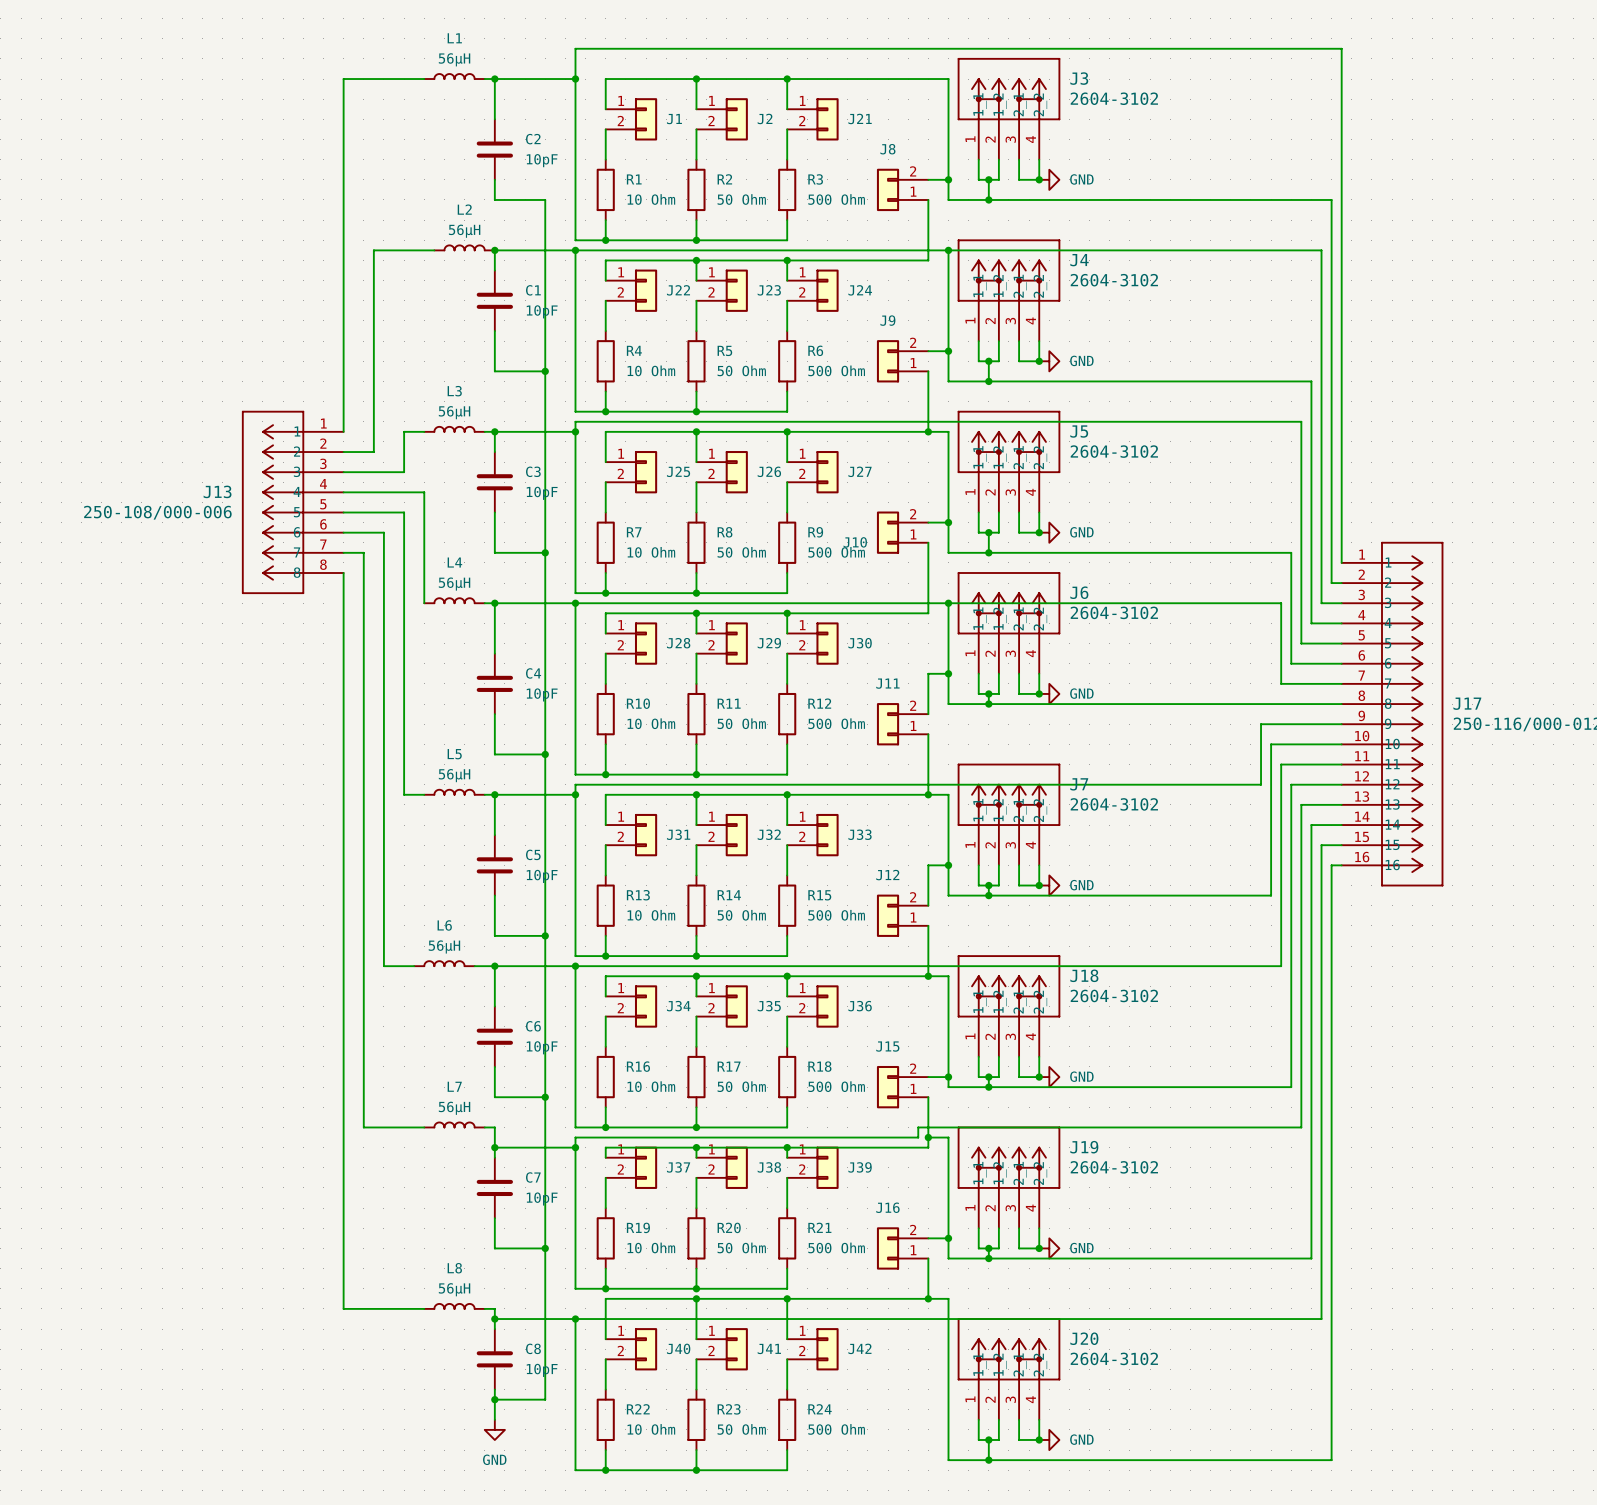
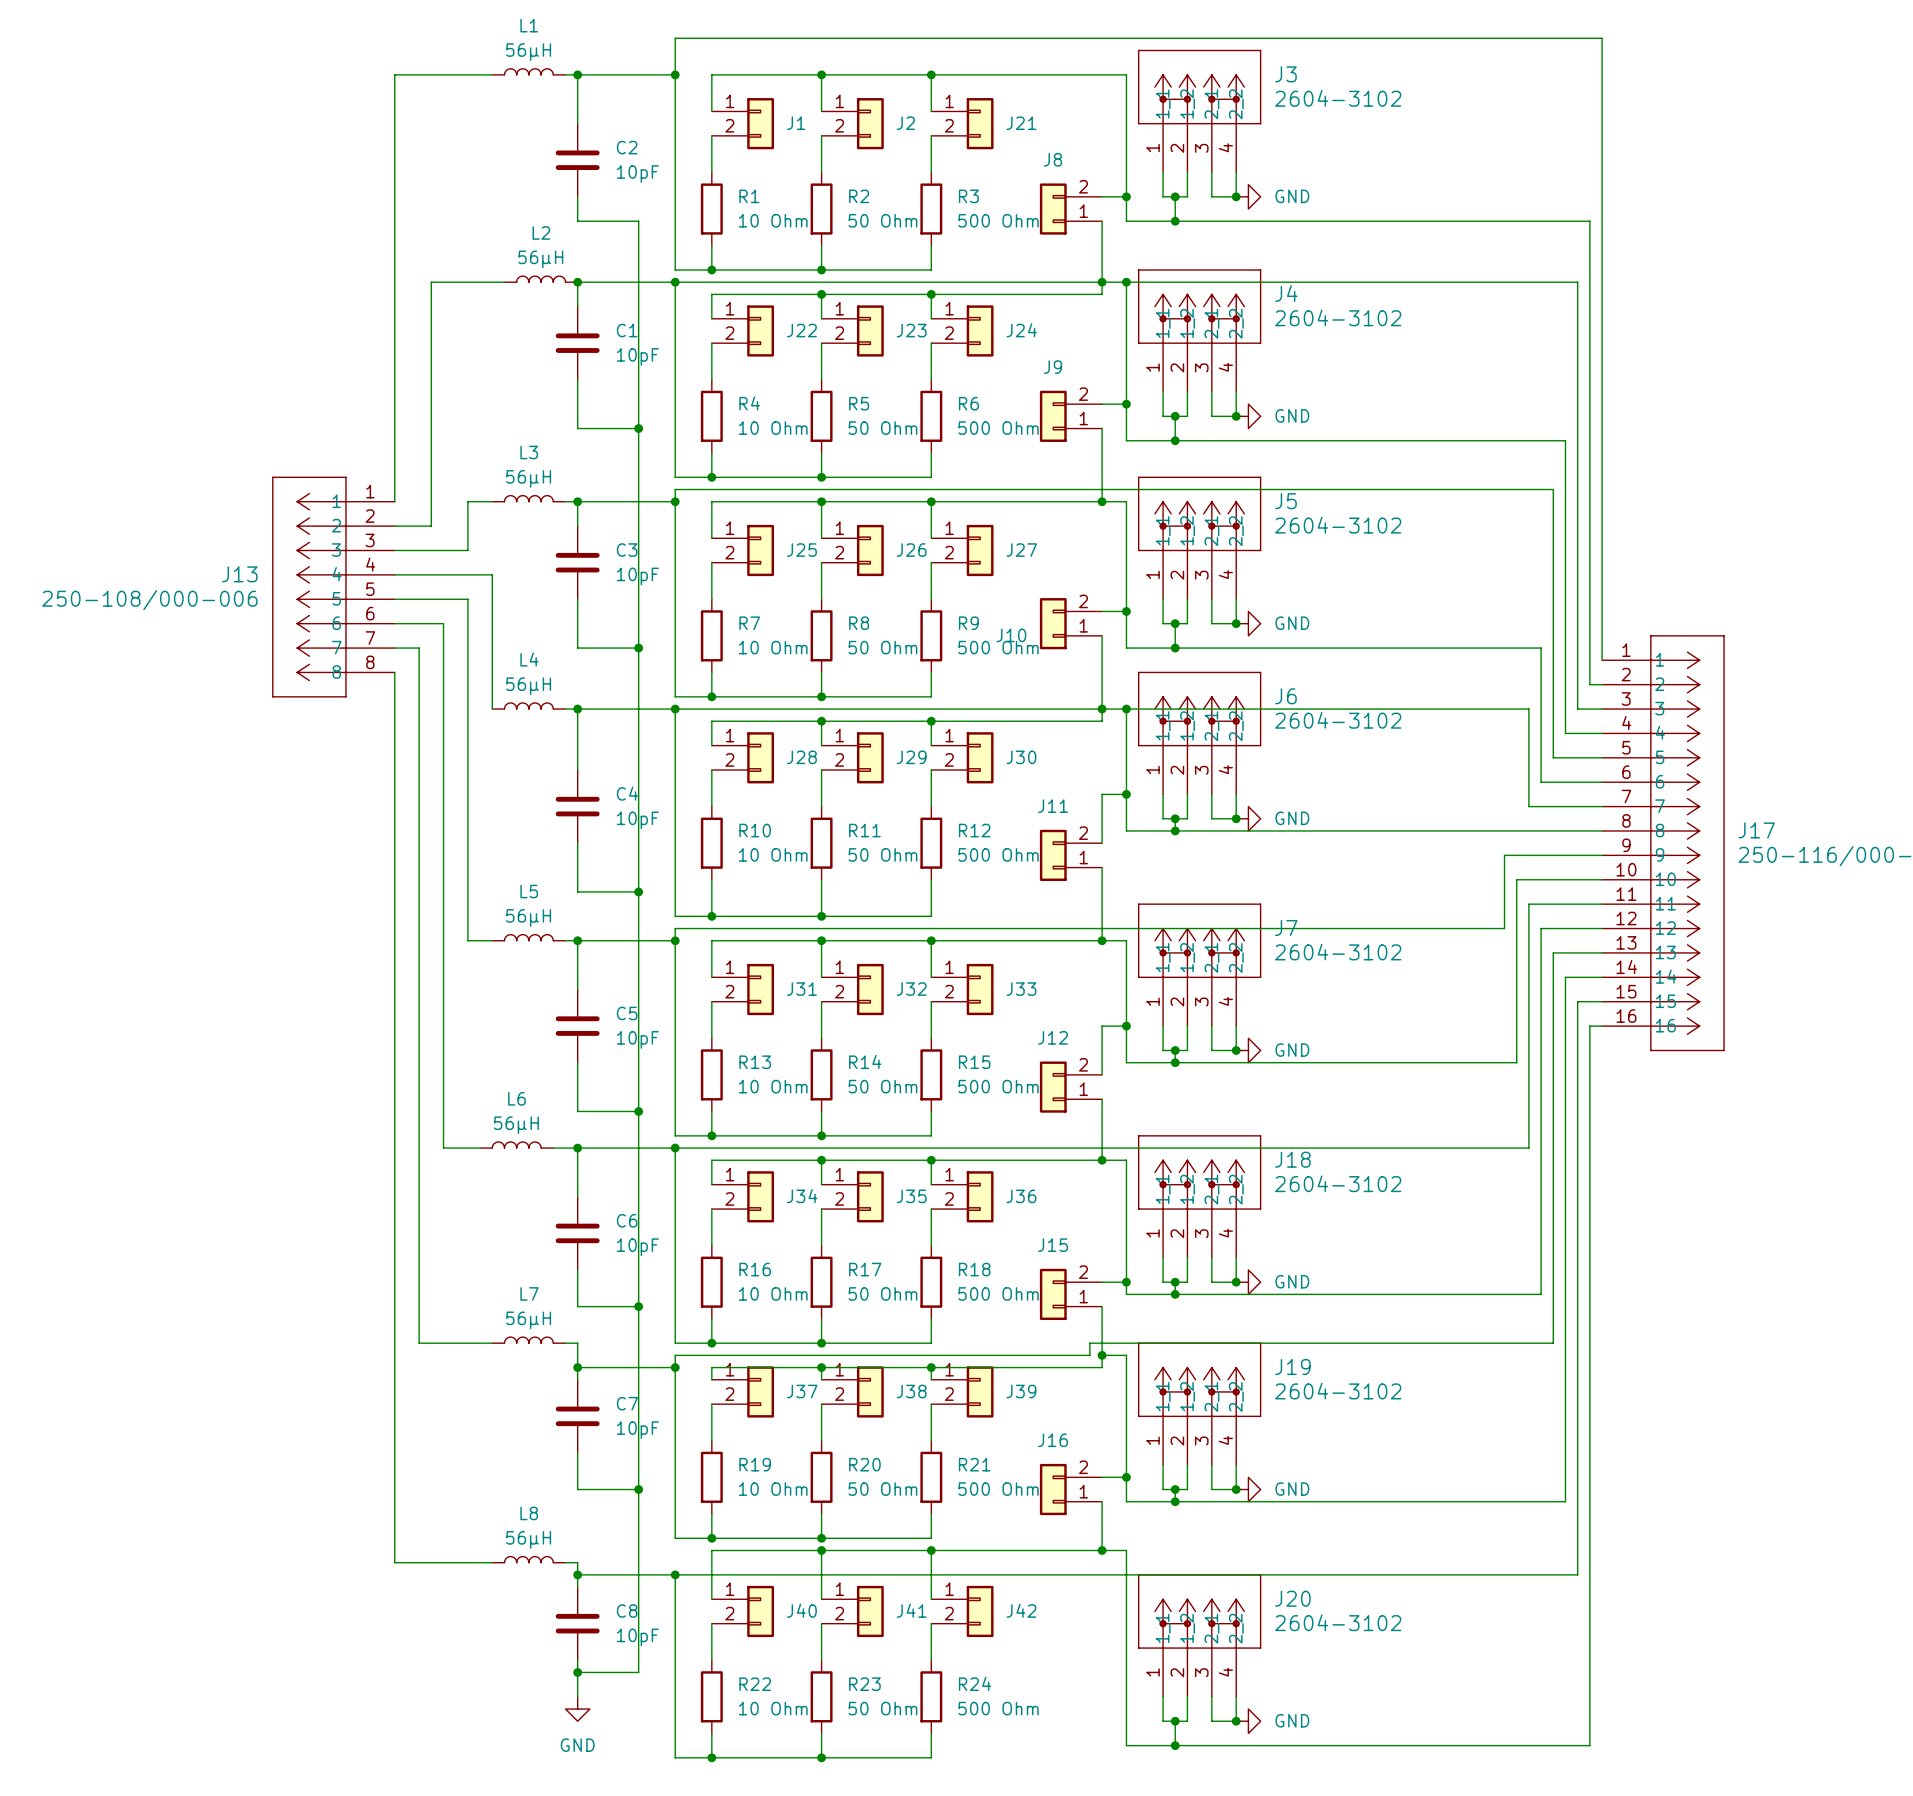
junction: none -> (1102, 282)
junction: none -> (1102, 709)

